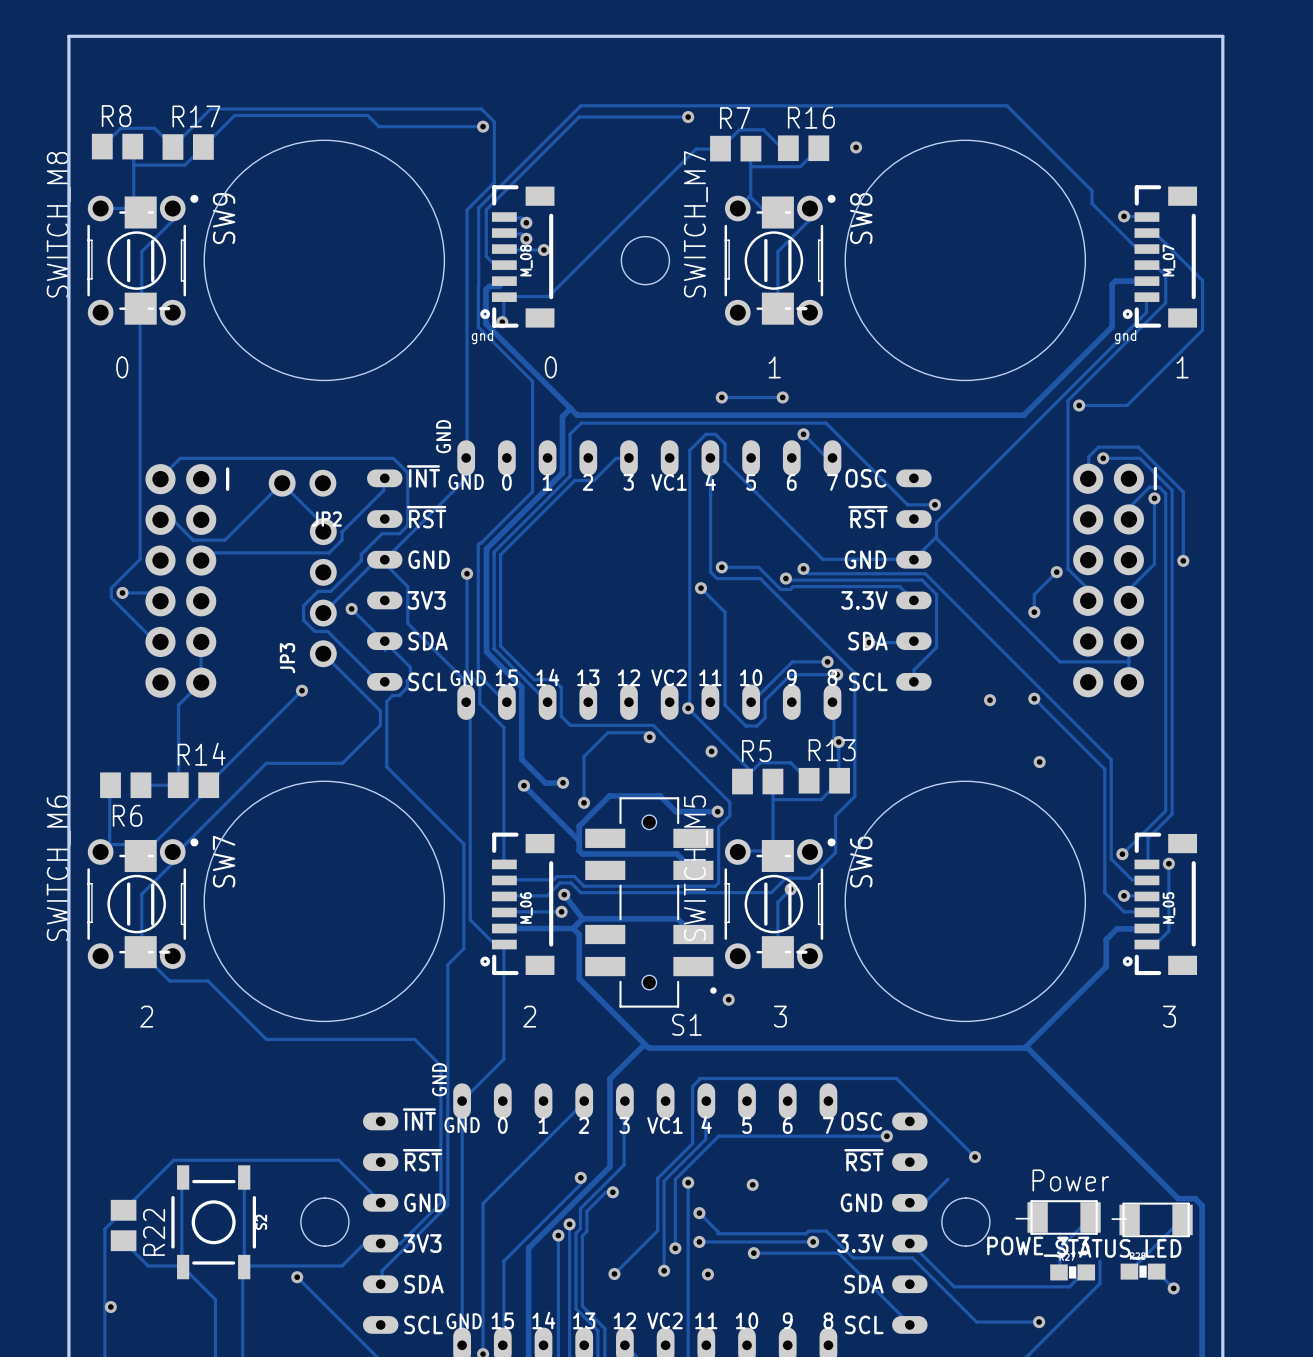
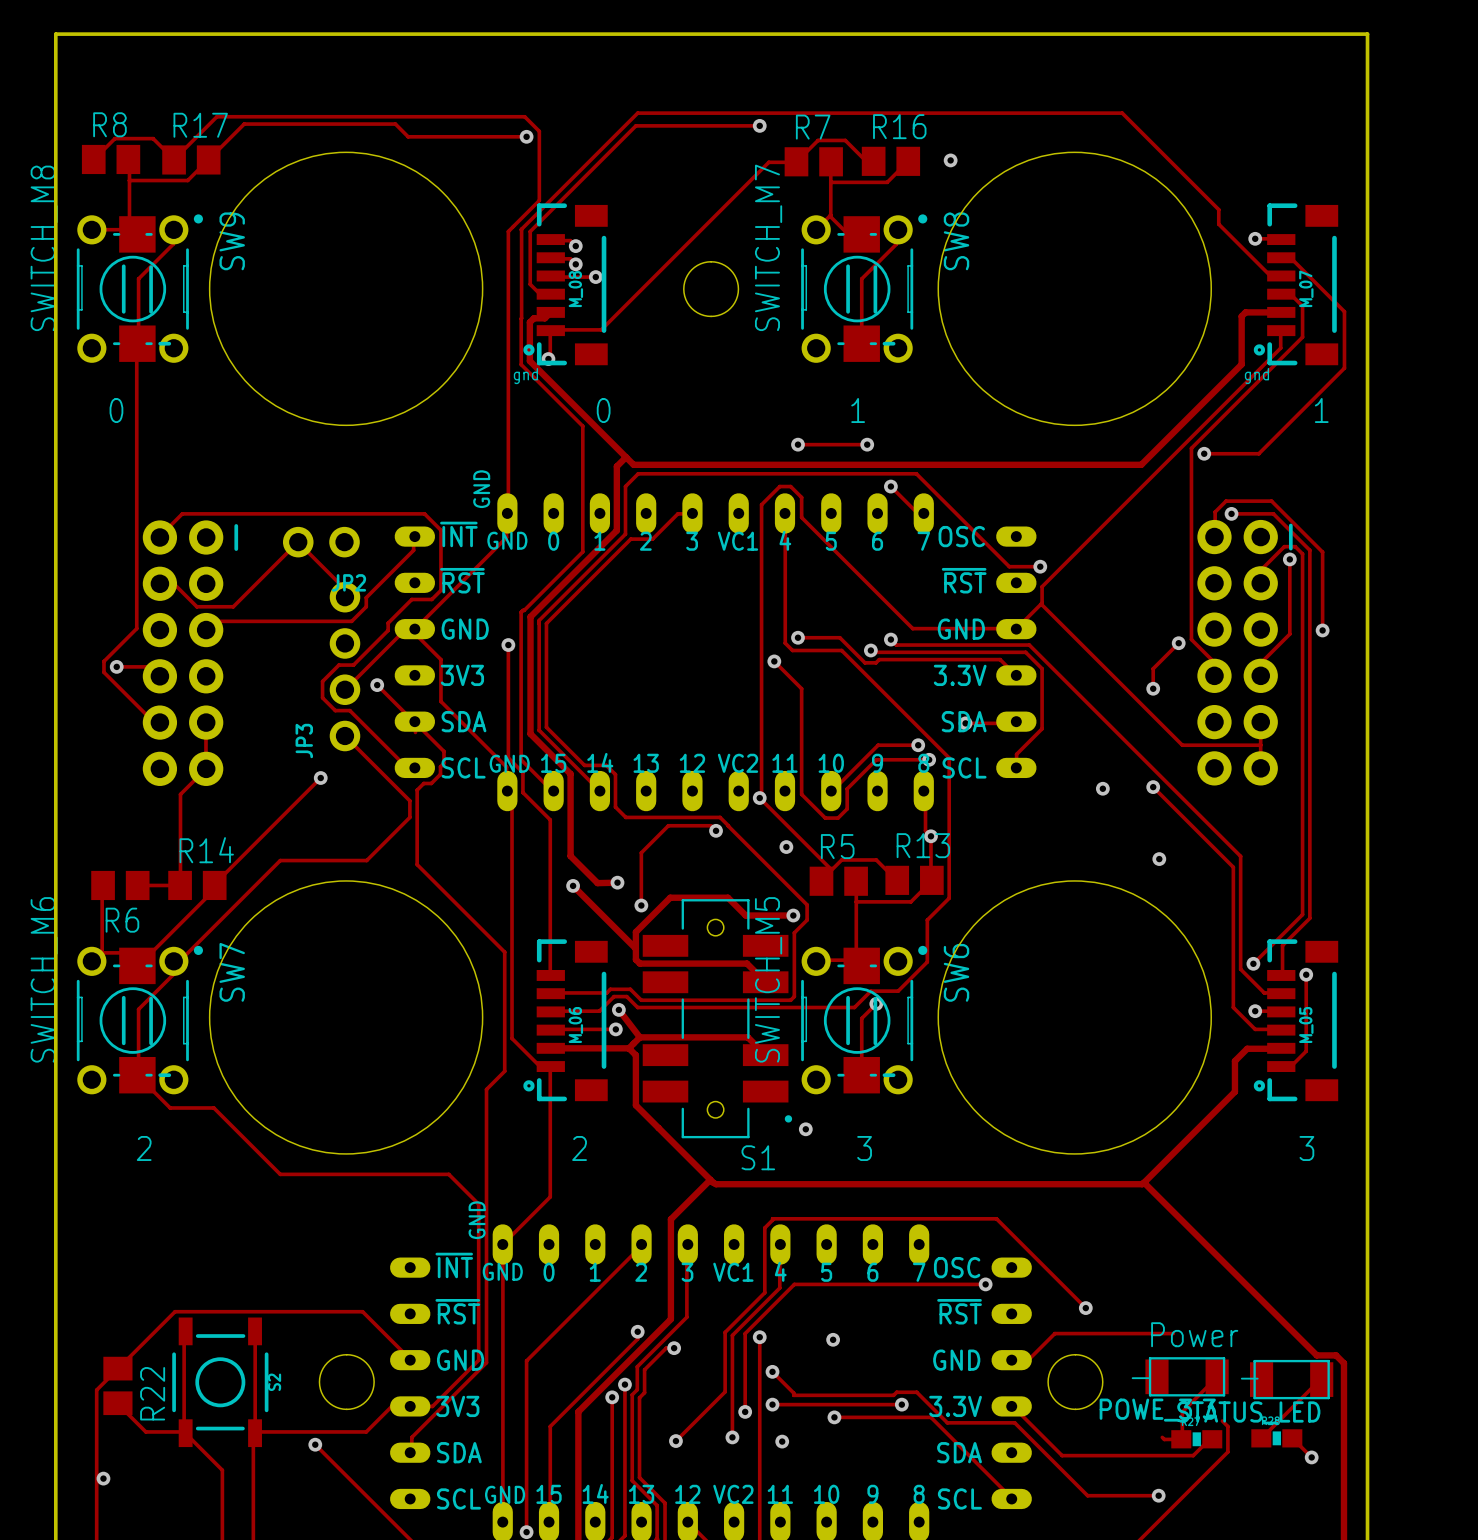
track: none -> (1054, 1333) (1173, 1333)
track: none -> (1222, 1421) (1227, 1426)
track: none -> (1162, 1437) (1164, 1439) (1181, 1439)

